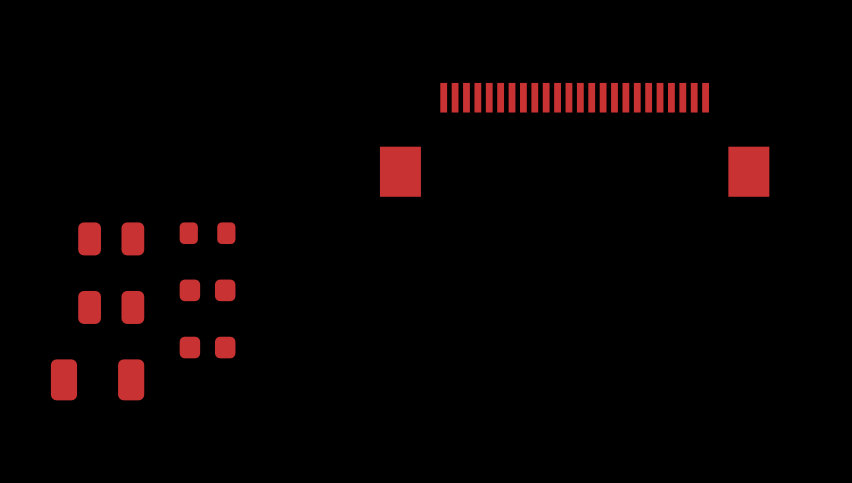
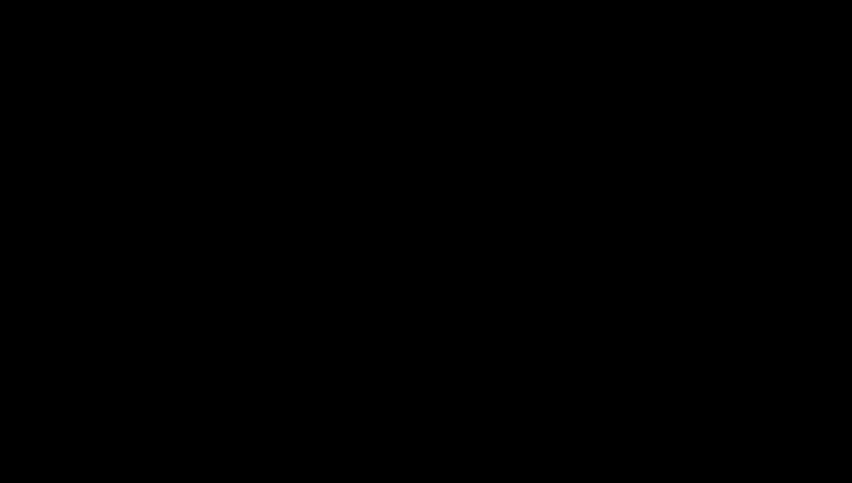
part: (574, 139) -> none
part: (207, 233) -> none
part: (111, 238) -> none
part: (207, 290) -> none
part: (111, 307) -> none
part: (207, 347) -> none
part: (97, 379) -> none

